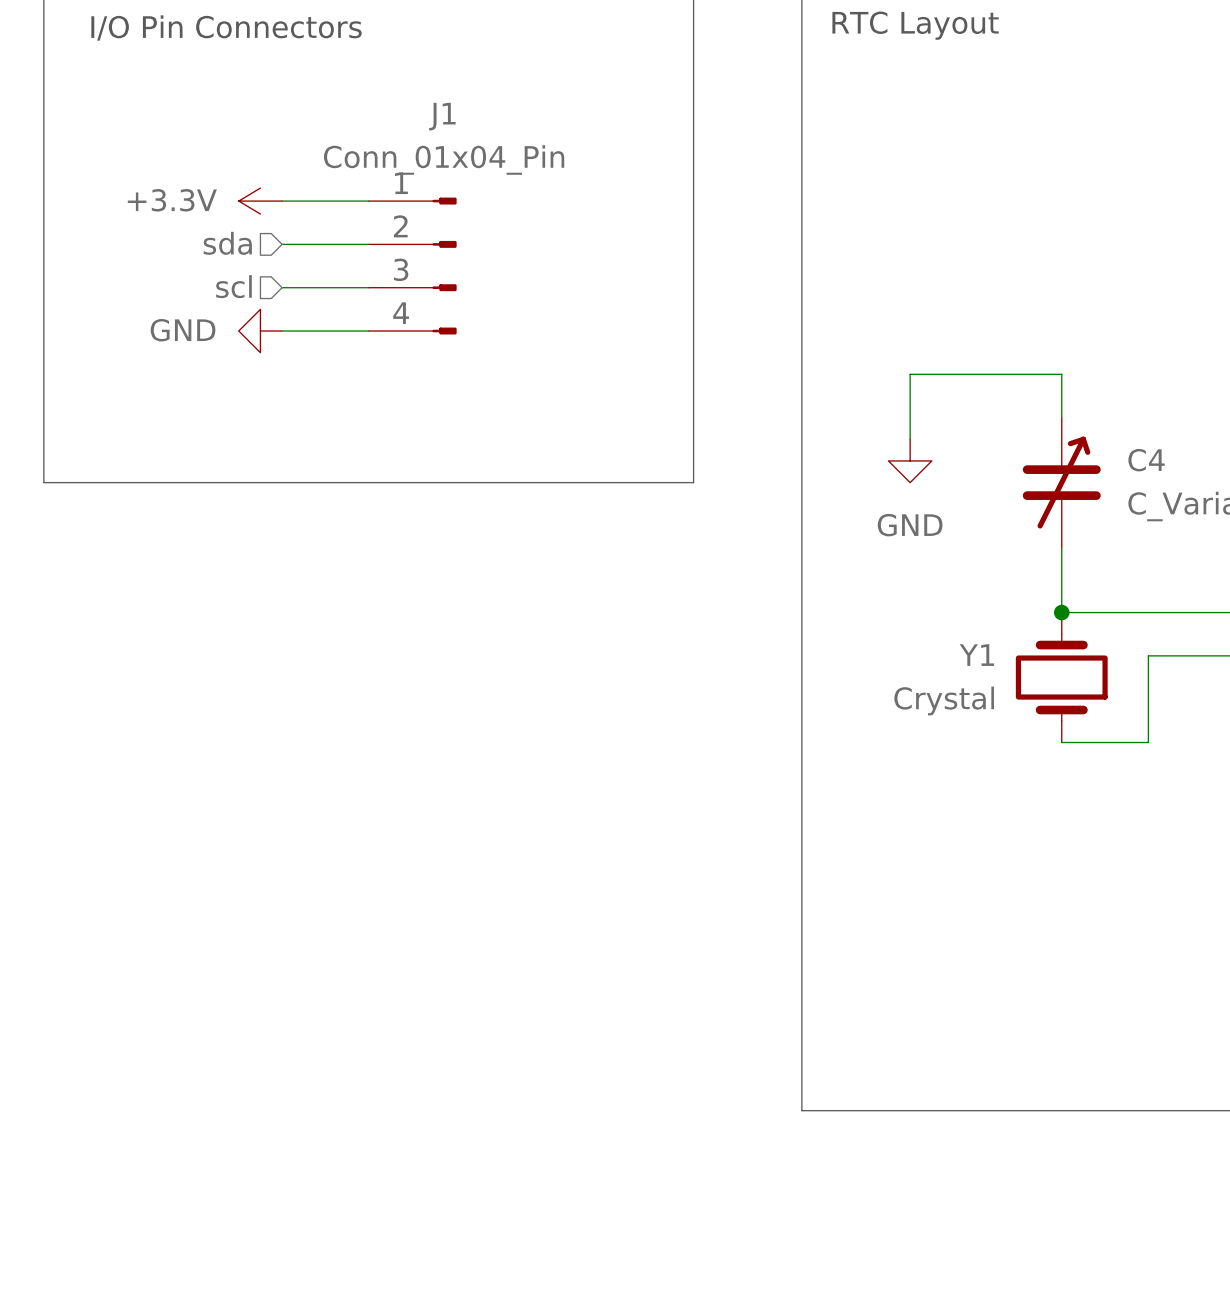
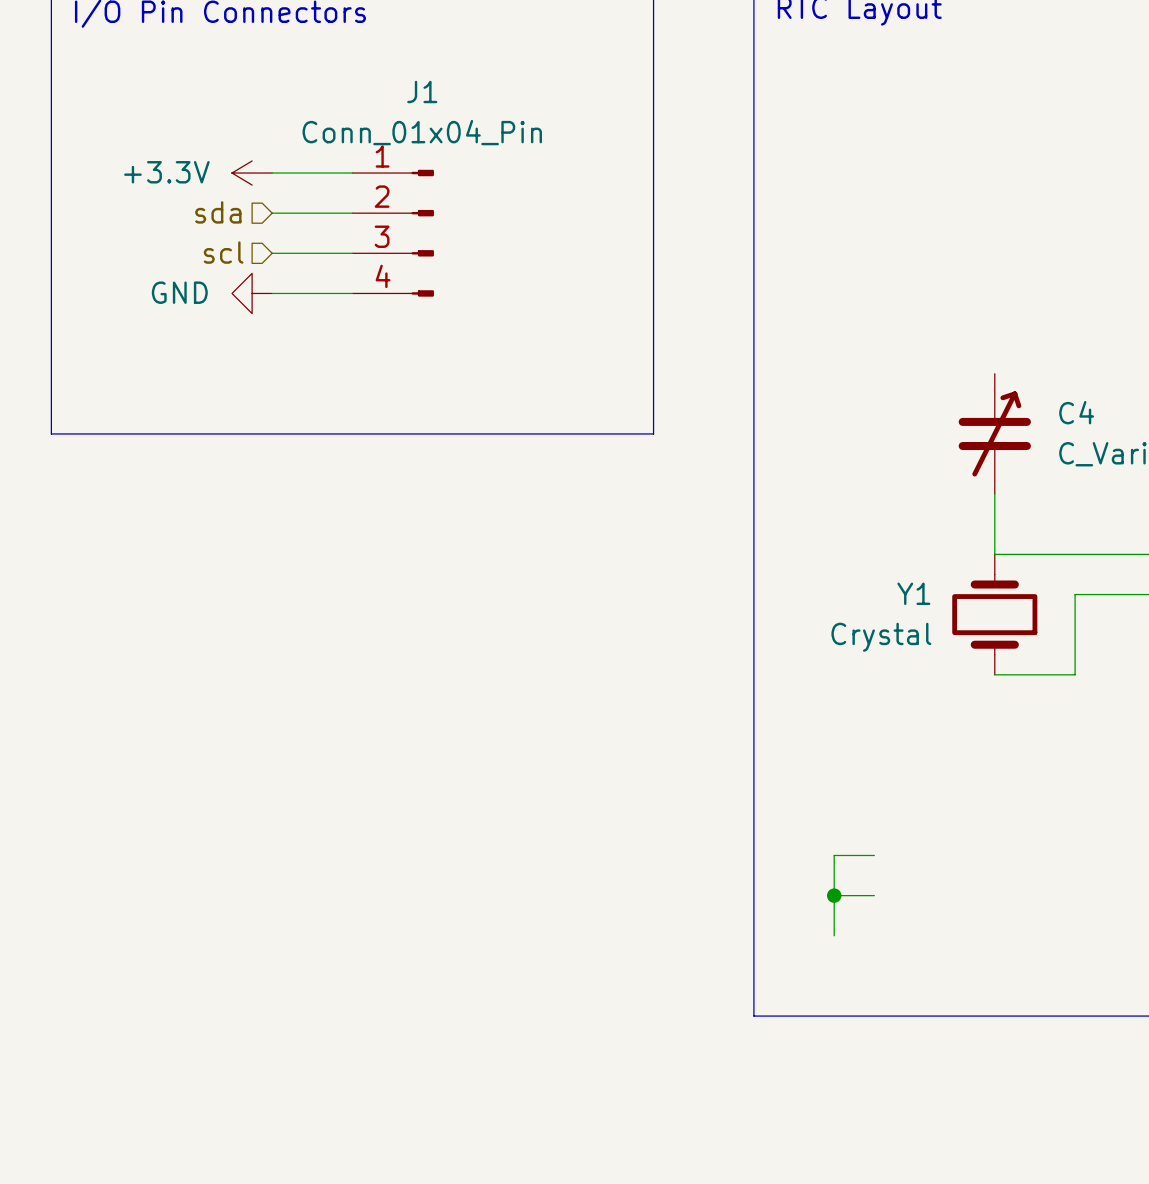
wire: (1061, 417) (1061, 374) (910, 374) (910, 439) -> none
power symbol: GND (910, 460) -> none
junction: (1061, 612) -> none
wire: none -> (874, 855) (834, 855) (834, 935)
wire: none -> (834, 895) (874, 895)
junction: none -> (834, 895)

